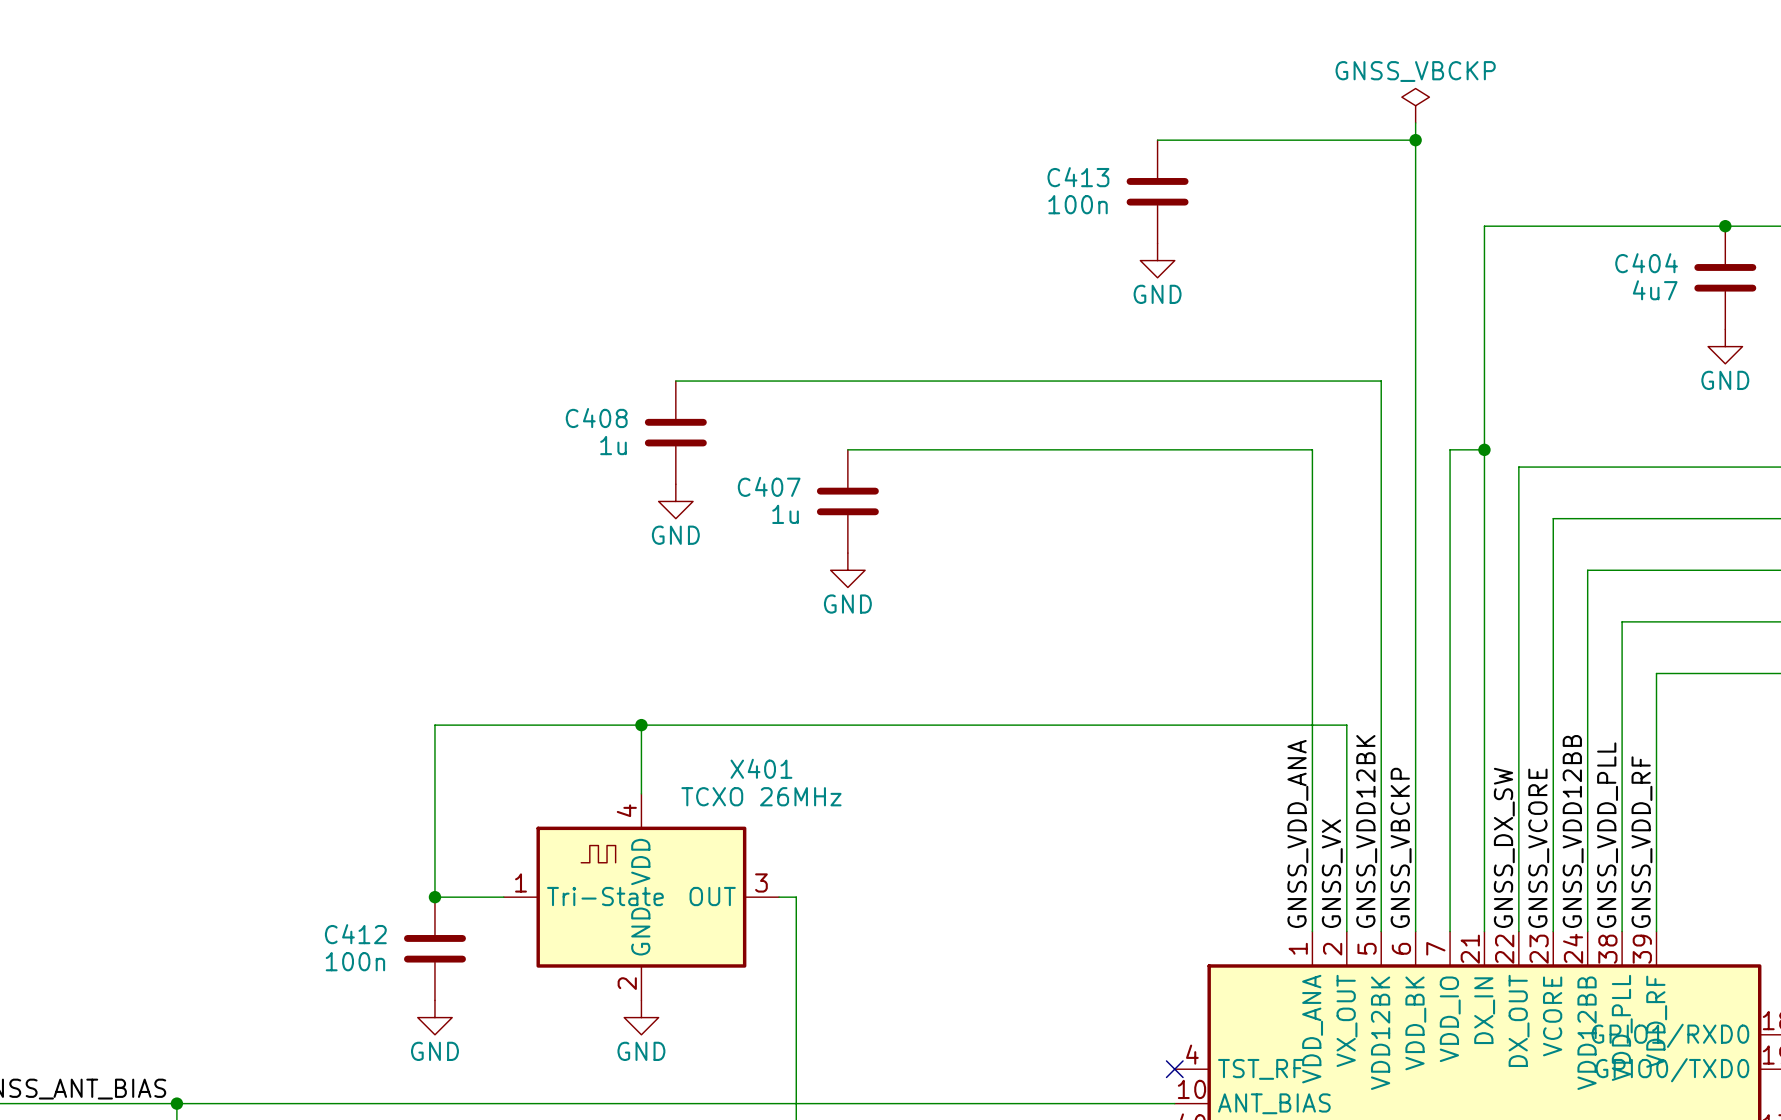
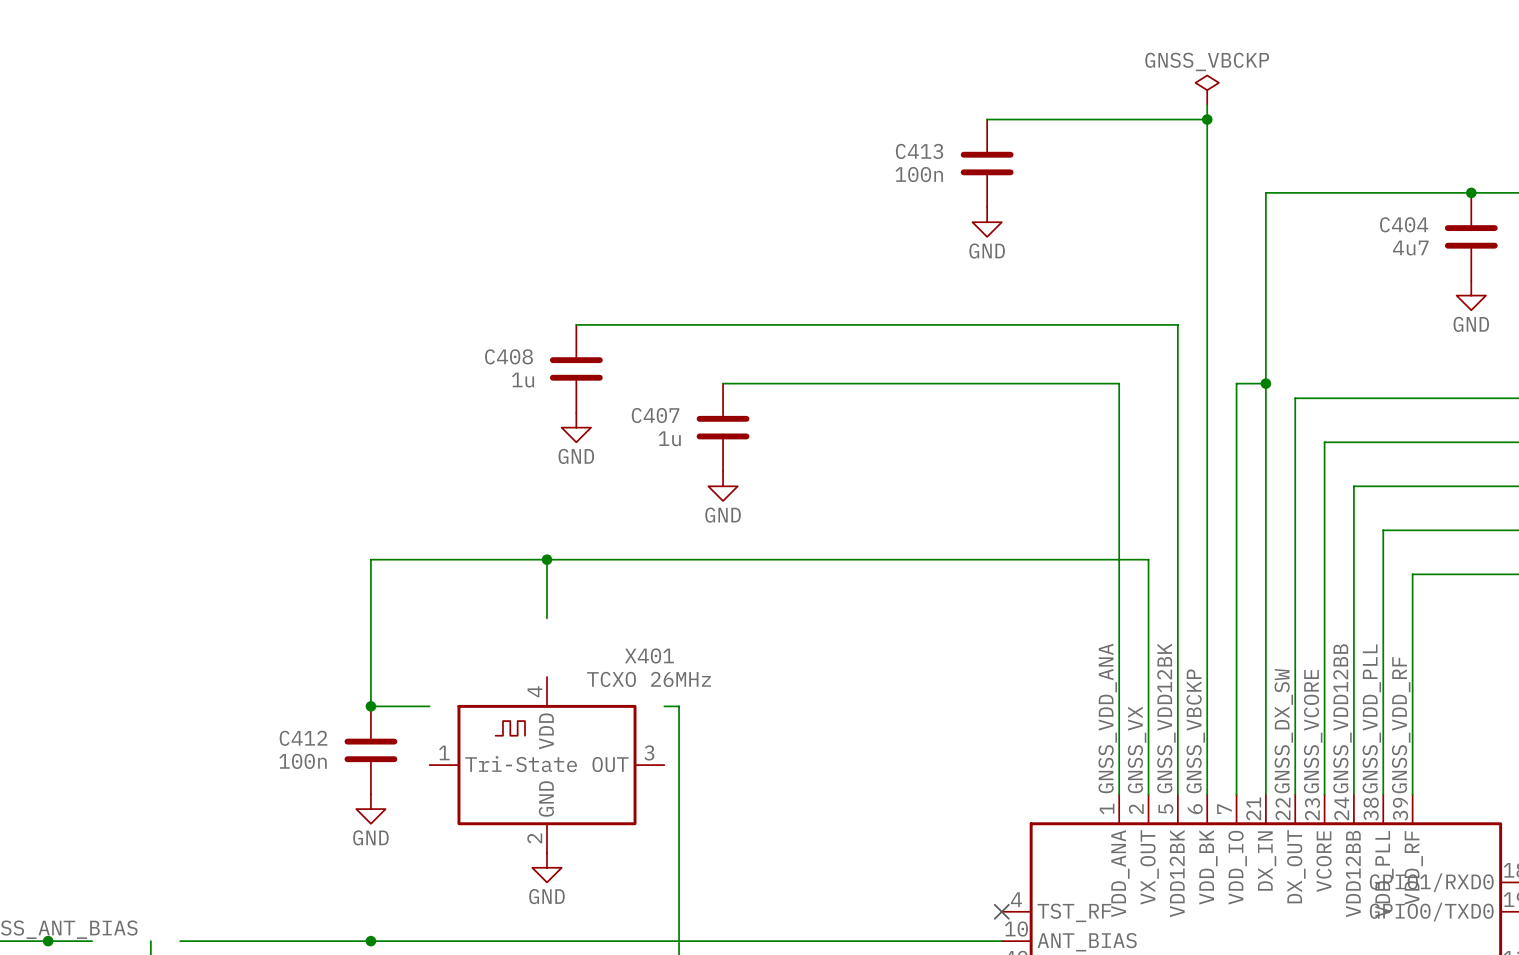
wire: (434, 725) (1346, 725) -> (370, 618) (370, 559) (1148, 559) (1148, 618)
wire: (641, 725) (641, 793) -> (546, 618) (546, 559)
junction position: (641, 725) -> (546, 559)
wire: (434, 828) (434, 897) (503, 897) -> (370, 706) (429, 706)
junction position: (434, 897) -> (370, 706)
wire: (779, 897) (796, 897) -> (664, 706) (679, 706) (679, 765)
C412 position: (434, 948) -> (370, 750)
power symbol position: GND (434, 1017) -> GND (370, 809)
junction: none -> (48, 941)
wire: (108, 1103) (211, 1103) -> none
junction: (176, 1103) -> none
junction: none -> (370, 941)

